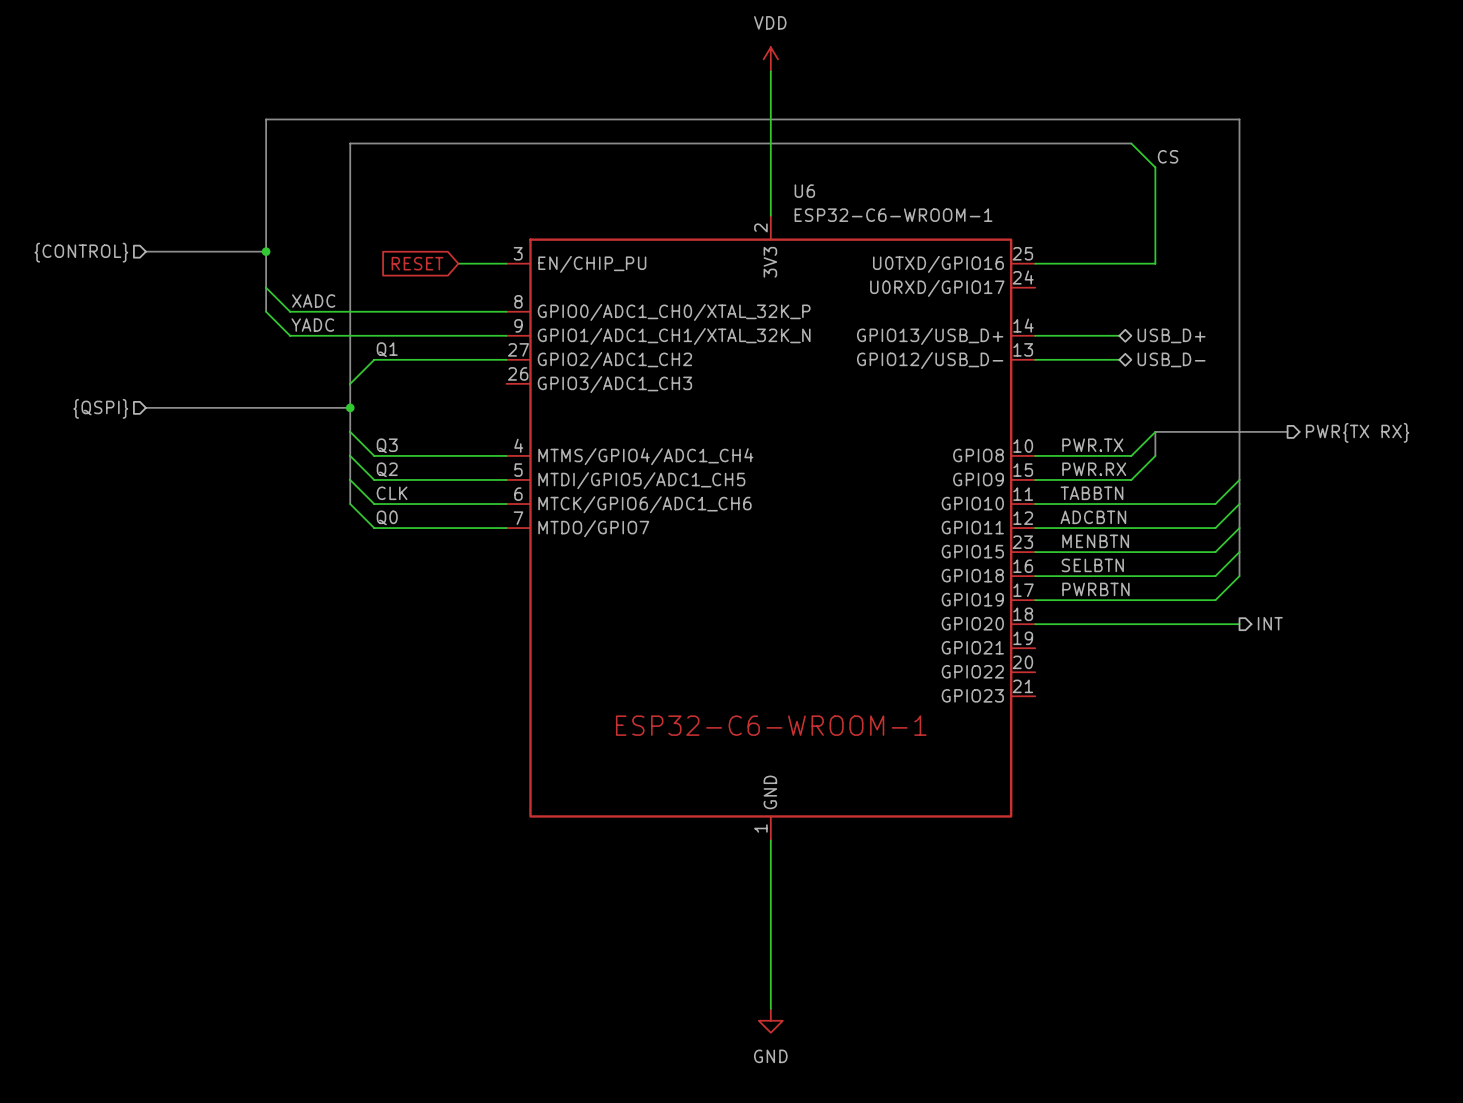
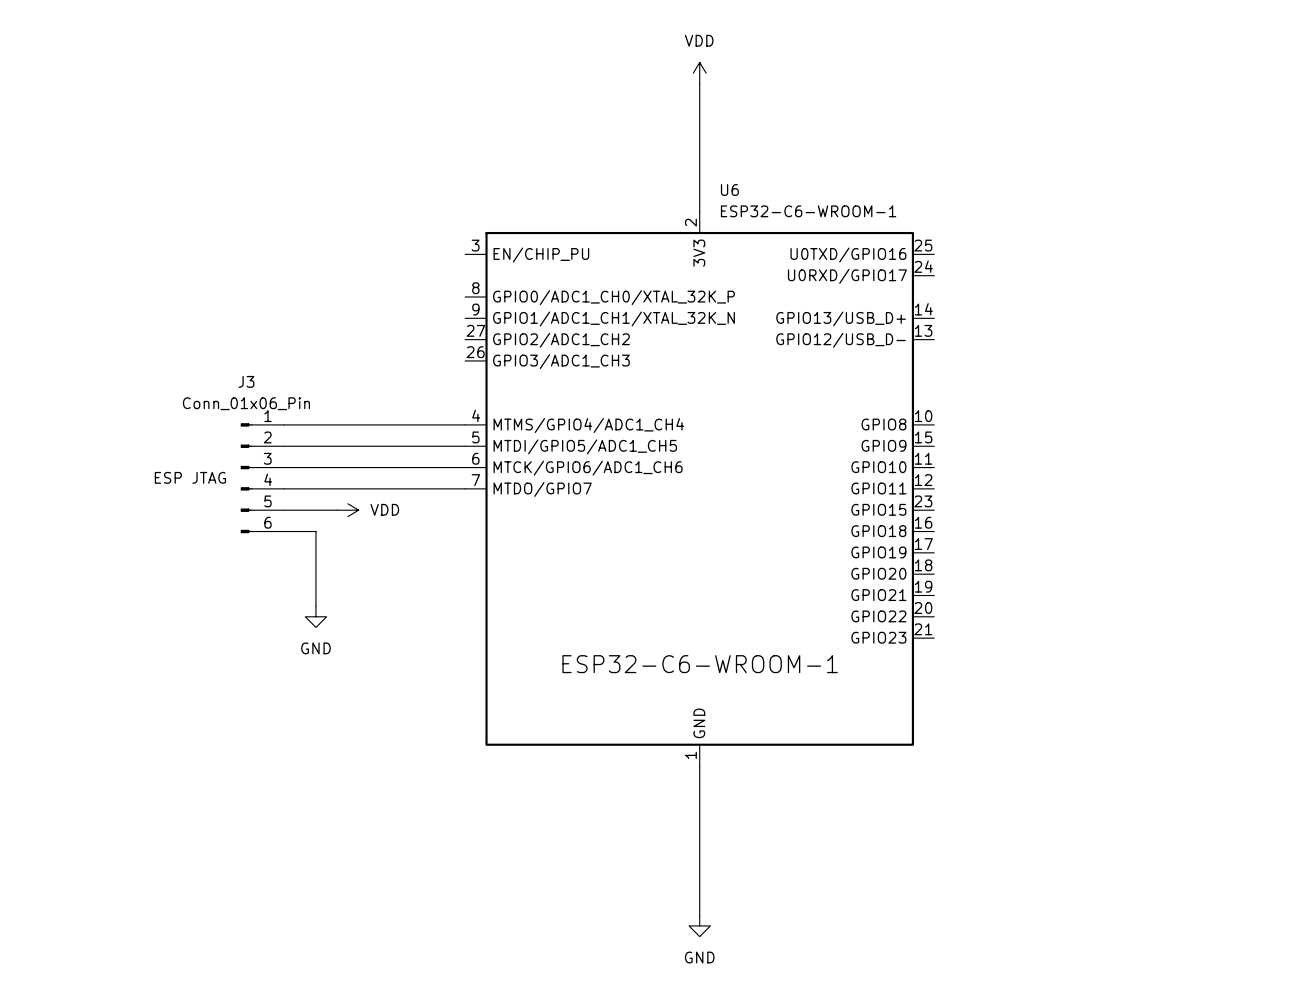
wire: (1131, 143) (1155, 167) (1155, 263) (1035, 263) -> none
bus: (1131, 143) (350, 143) (350, 504) -> none
label: CS (1168, 156) -> none
bus: (145, 251) (266, 251) -> none
junction: (266, 251) -> none
hierarchical label: {CONTROL} (81, 252) -> none
global label: RESET (417, 263) -> none
wire: (458, 263) (506, 263) -> none
wire: (266, 287) (290, 311) (506, 311) -> none
label: XADC (313, 301) -> none
wire: (266, 311) (290, 335) (506, 335) -> none
bus: (266, 311) (266, 119) (1239, 119) (1239, 576) -> none
label: YADC (312, 325) -> none
wire: (1035, 335) (1119, 335) -> none
hierarchical label: USB_D+ (1171, 335) -> none
label: Q1 (387, 349) -> none
wire: (506, 359) (374, 359) (350, 383) -> none
wire: (1035, 359) (1119, 359) -> none
hierarchical label: USB_D- (1171, 359) -> none
bus: (145, 407) (350, 407) -> none
junction: (350, 407) -> none
hierarchical label: {QSPI} (100, 408) -> none
wire: (350, 431) (374, 455) -> (283, 424) (347, 424)
wire: (1155, 431) (1131, 455) (1035, 455) -> none
bus: (1287, 431) (1155, 431) (1155, 455) -> none
hierarchical label: PWR{TX RX} (1357, 432) -> none
label: Q3 (387, 445) -> none
label: PWR.TX (1092, 445) -> none
wire: (350, 455) (374, 479) -> (283, 446) (347, 446)
wire: (1155, 455) (1131, 479) (1035, 479) -> none
label: Q2 (387, 469) -> none
label: PWR.RX (1094, 469) -> none
wire: (350, 479) (374, 504) -> (283, 467) (347, 467)
wire: (1239, 479) (1215, 504) (1035, 504) -> none
label: CLK (392, 493) -> none
label: TABBTN (1091, 493) -> none
wire: (350, 504) (374, 528) -> (283, 488) (347, 488)
wire: (1239, 504) (1215, 528) (1035, 528) -> none
text: none -> ESP JTAG (190, 477)
J3: none -> Conn_01x06_Pin (262, 478)
label: Q0 (387, 517) -> none
label: ADCBTN (1093, 517) -> none
wire: (1239, 528) (1215, 552) (1035, 552) -> none
label: MENBTN (1095, 541) -> none
wire: none -> (283, 510) (337, 510)
power symbol: none -> VDD (347, 510)
wire: (1239, 552) (1215, 576) (1035, 576) -> none
label: SELBTN (1092, 565) -> none
wire: none -> (283, 531) (315, 531) (315, 606)
wire: (1239, 576) (1215, 600) (1035, 600) -> none
label: PWRBTN (1095, 589) -> none
hierarchical label: INT (1270, 623) -> none
wire: (1035, 624) (1239, 624) -> none
power symbol: none -> GND (315, 616)

